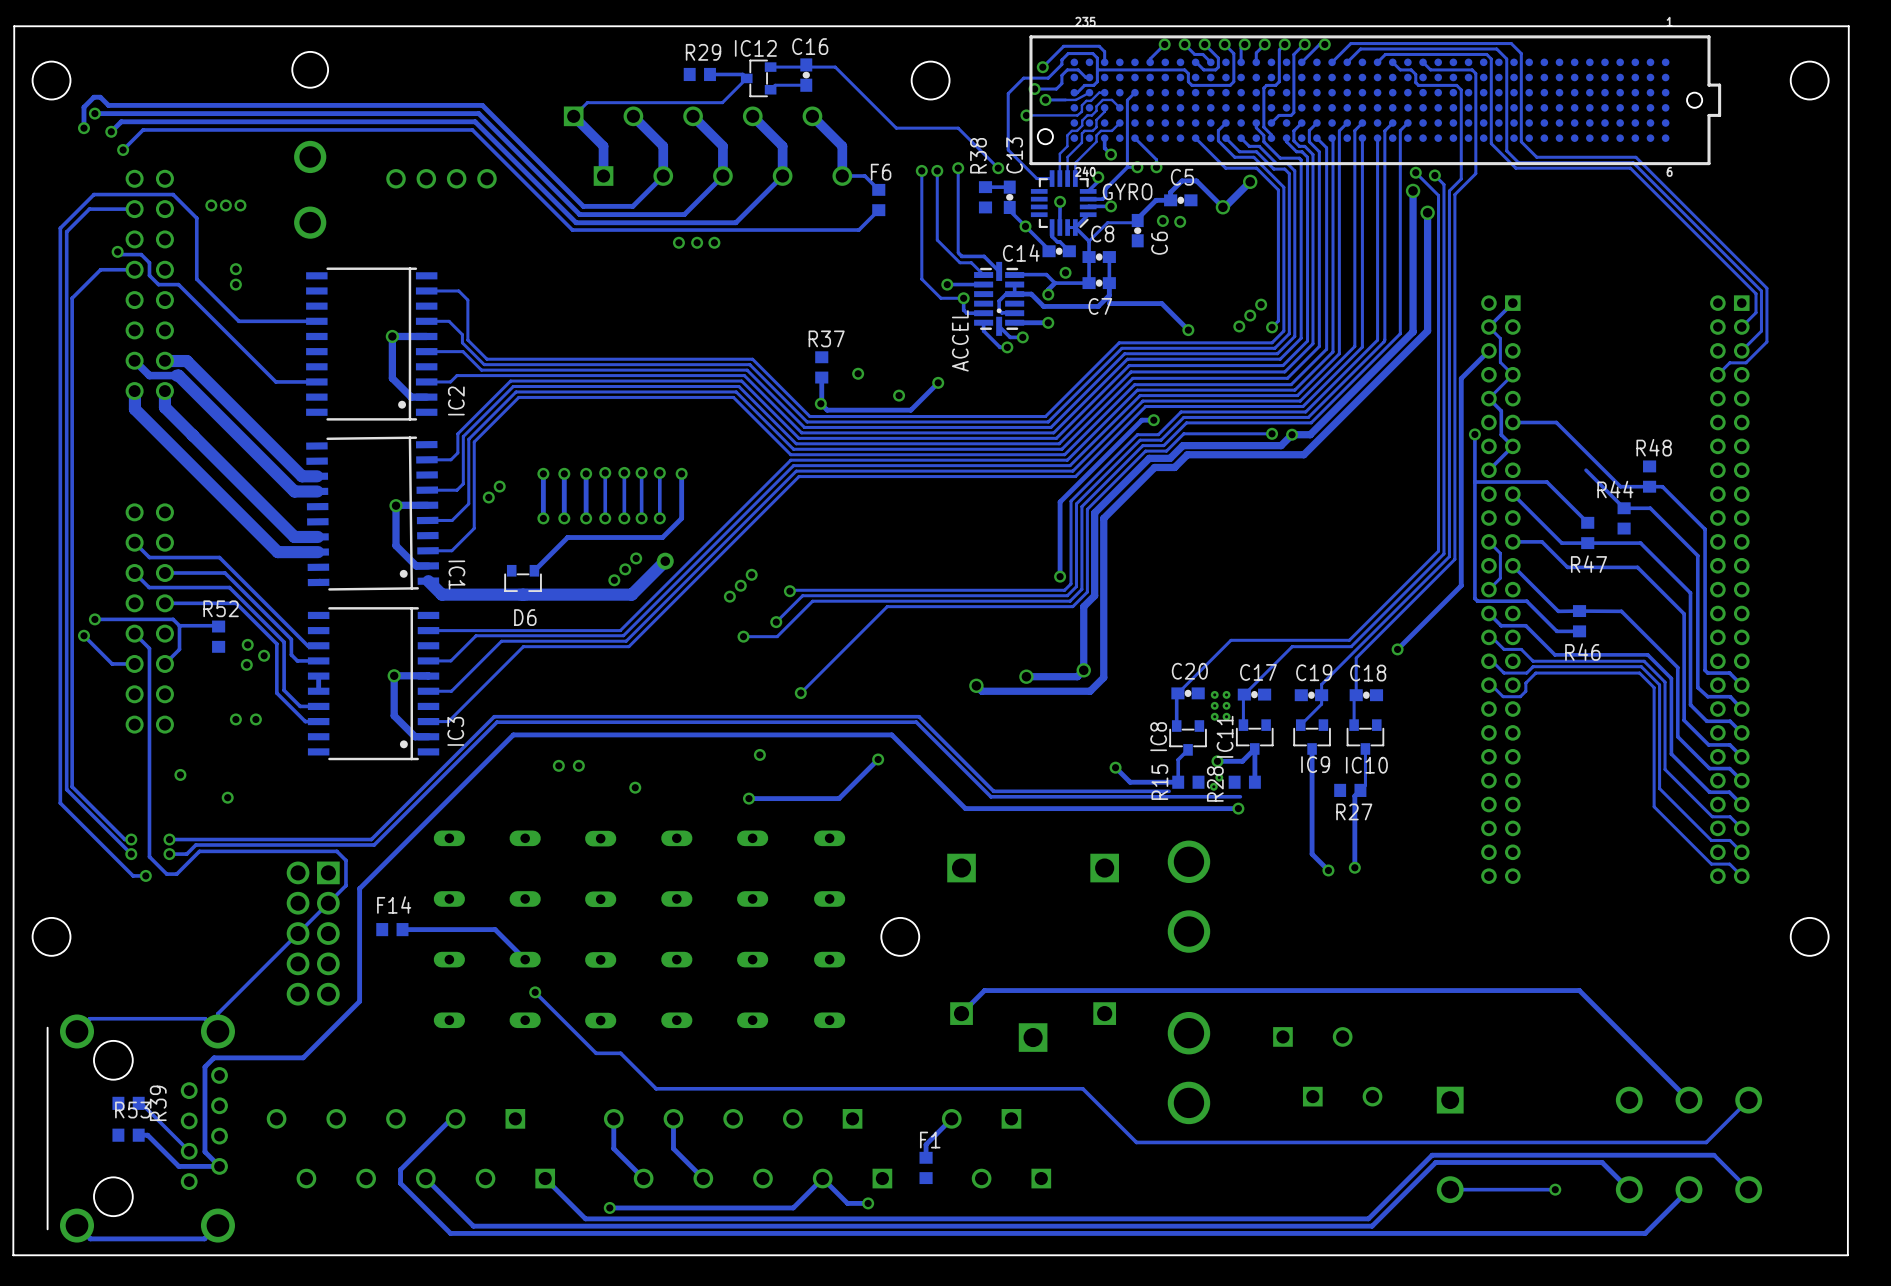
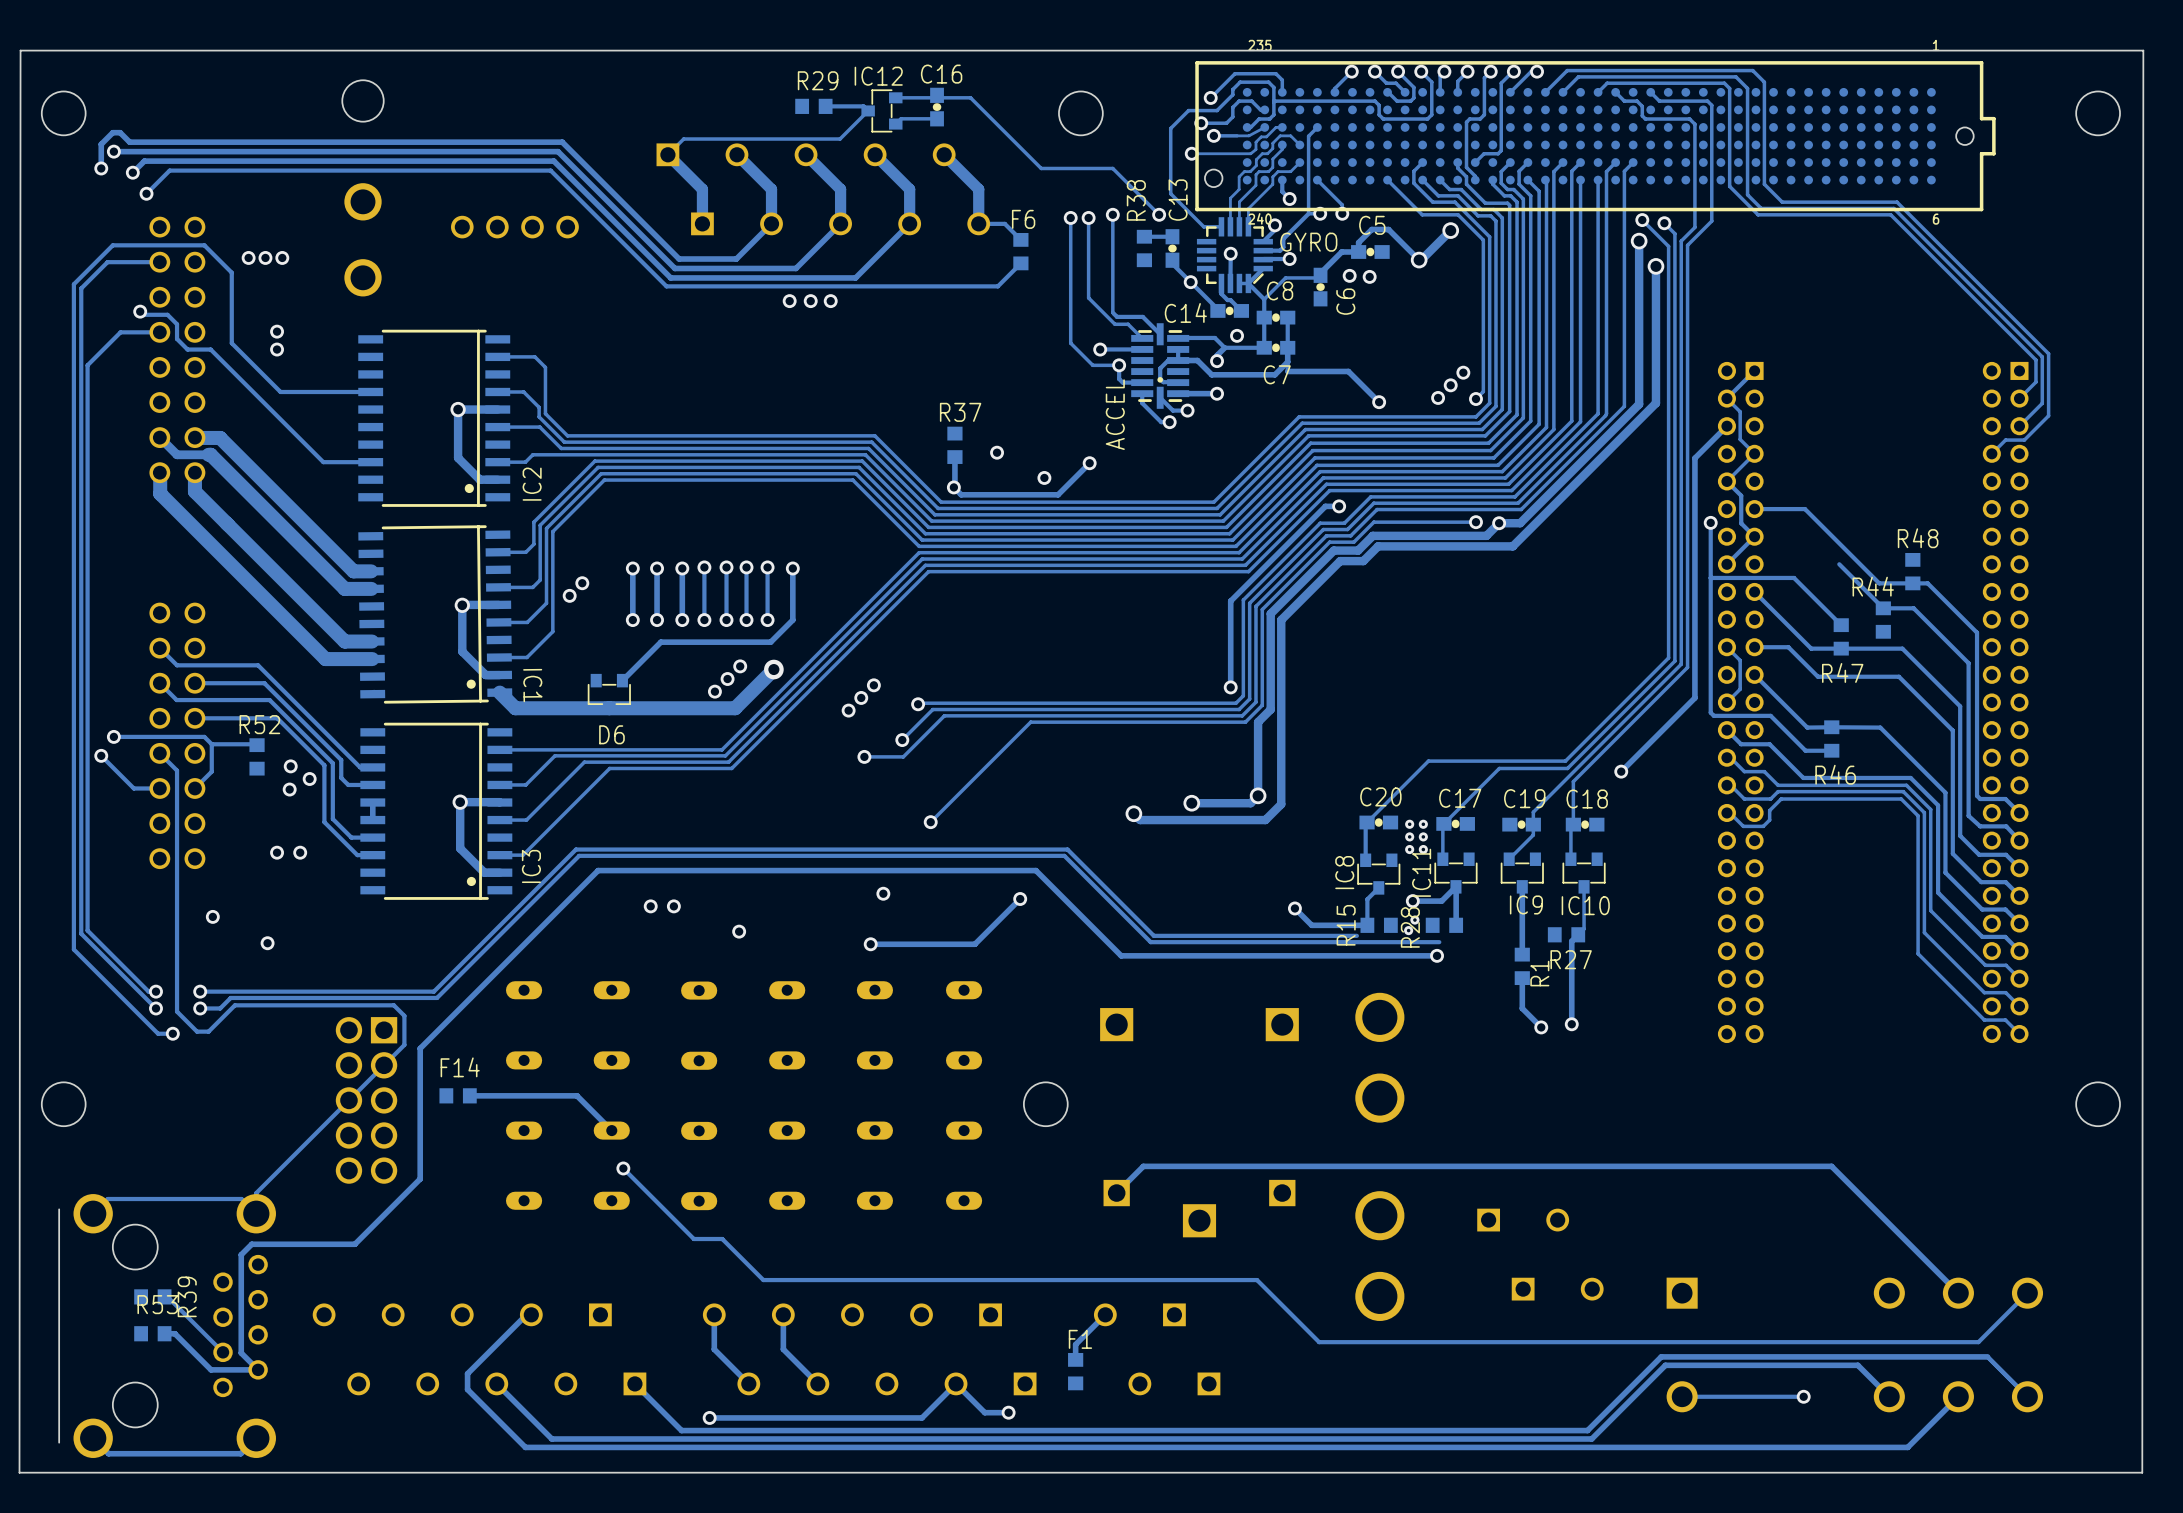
track: (1312, 807) (1312, 827) -> none
R1: none -> (1522, 966)

